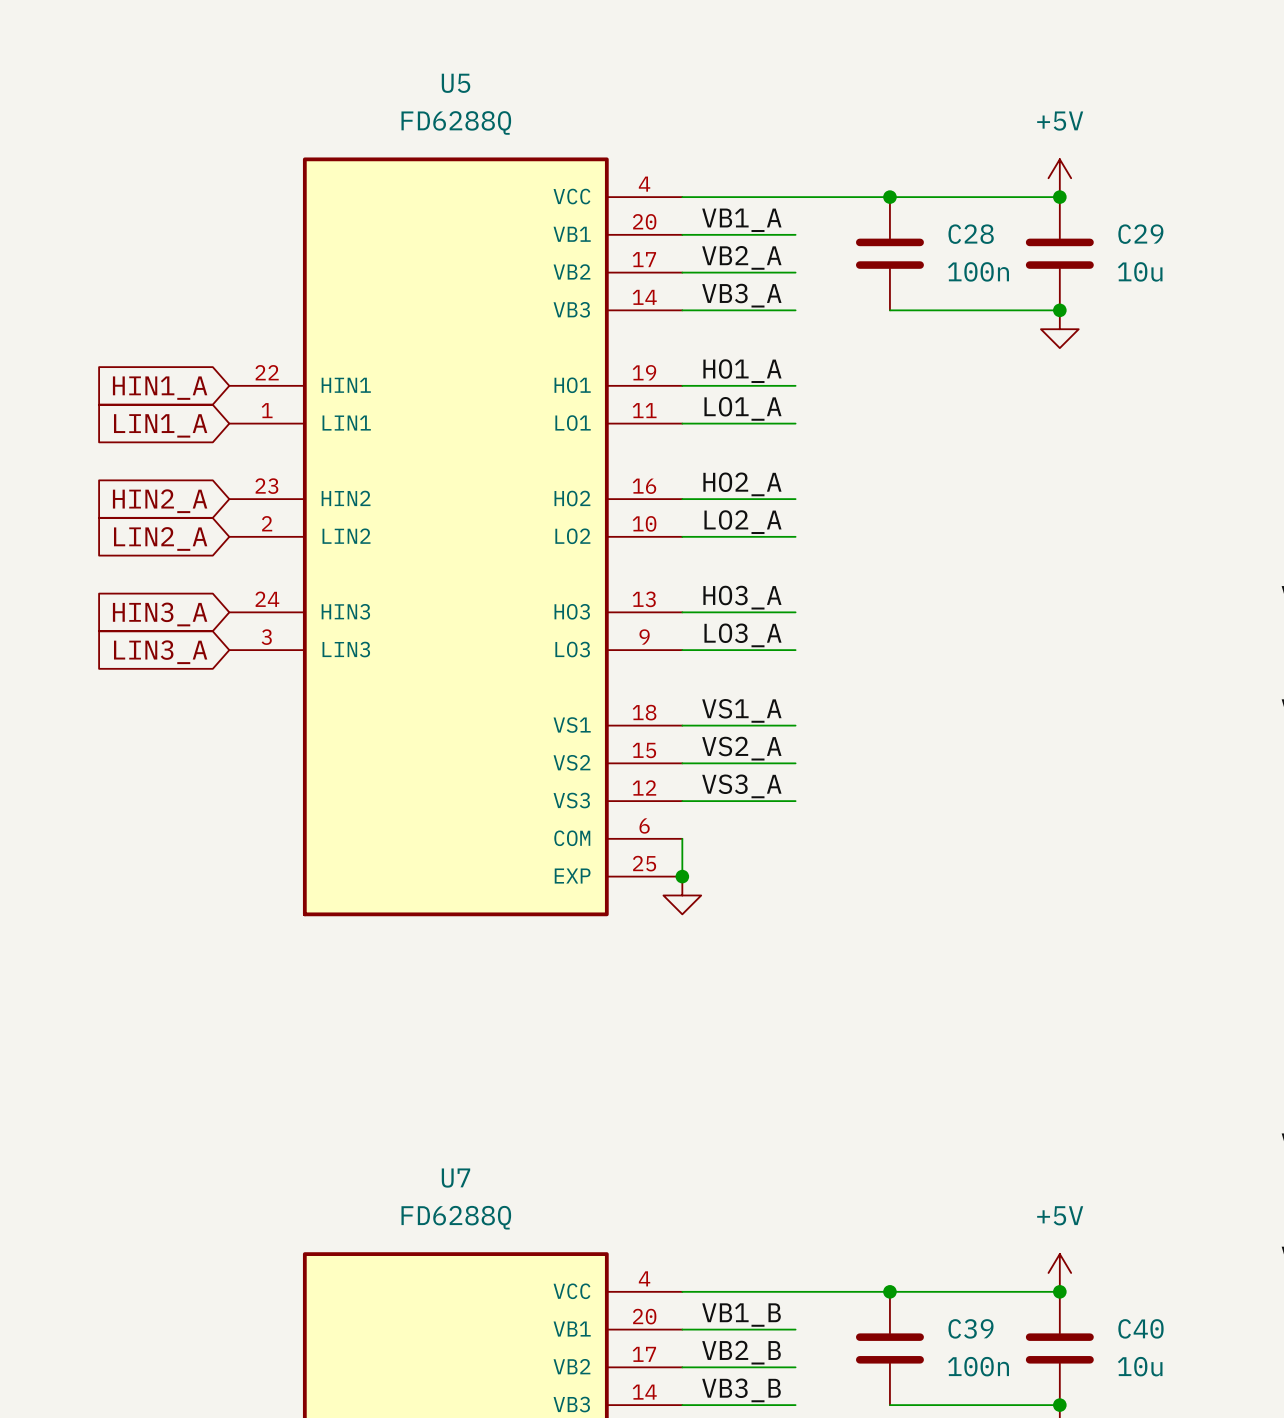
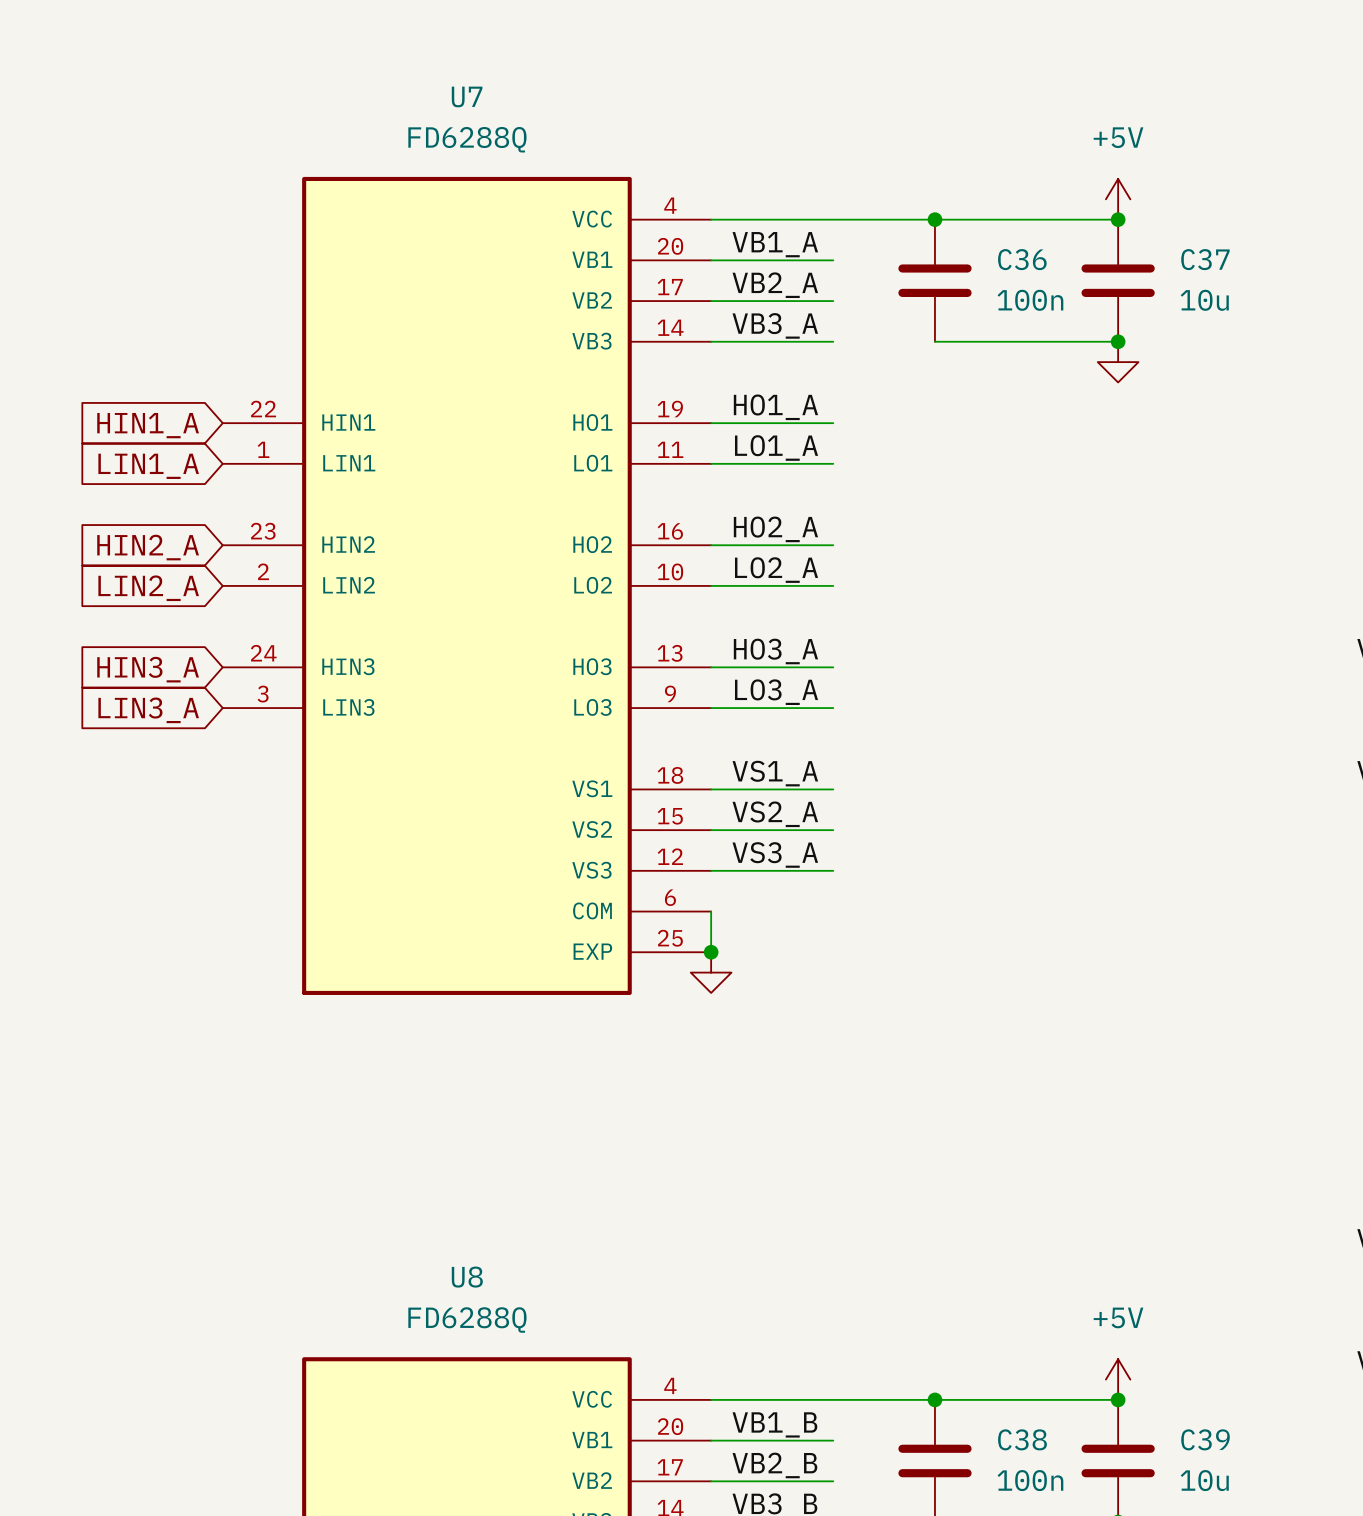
U5 name: U5 (456, 83) -> U7 (467, 96)
C28 name: C28 (971, 234) -> C36 (1022, 259)
C29 name: C29 (1140, 234) -> C37 (1205, 259)
U7 name: U7 (455, 1178) -> U8 (467, 1277)
C39 name: C39 (971, 1328) -> C38 (1022, 1439)
C40 name: C40 (1140, 1328) -> C39 (1205, 1439)

